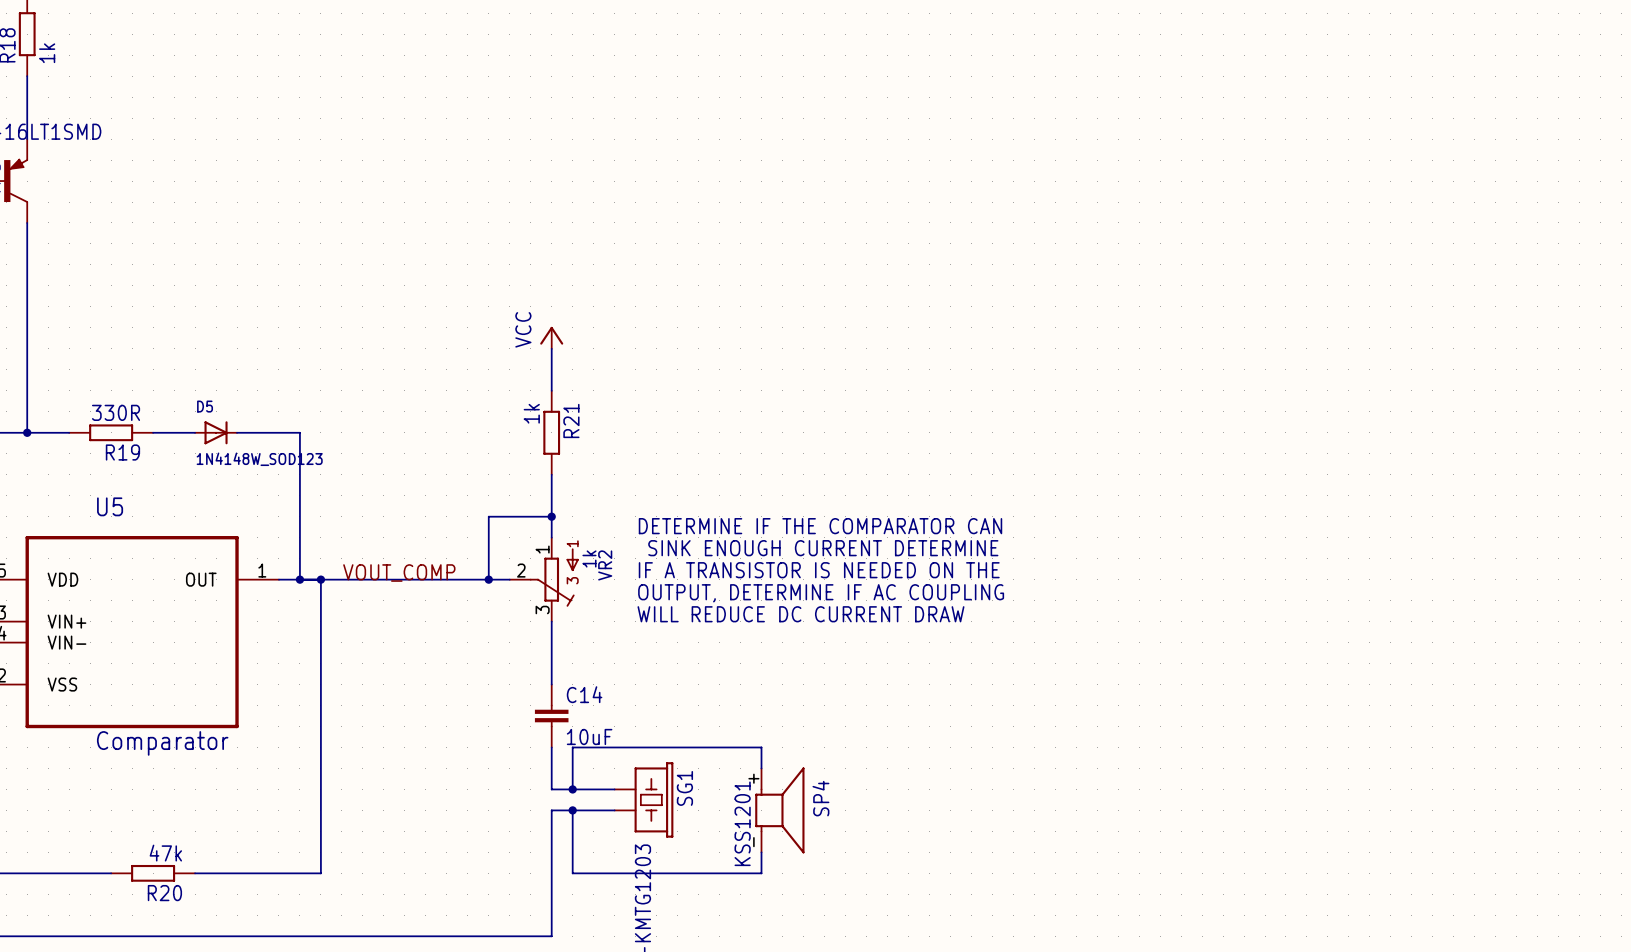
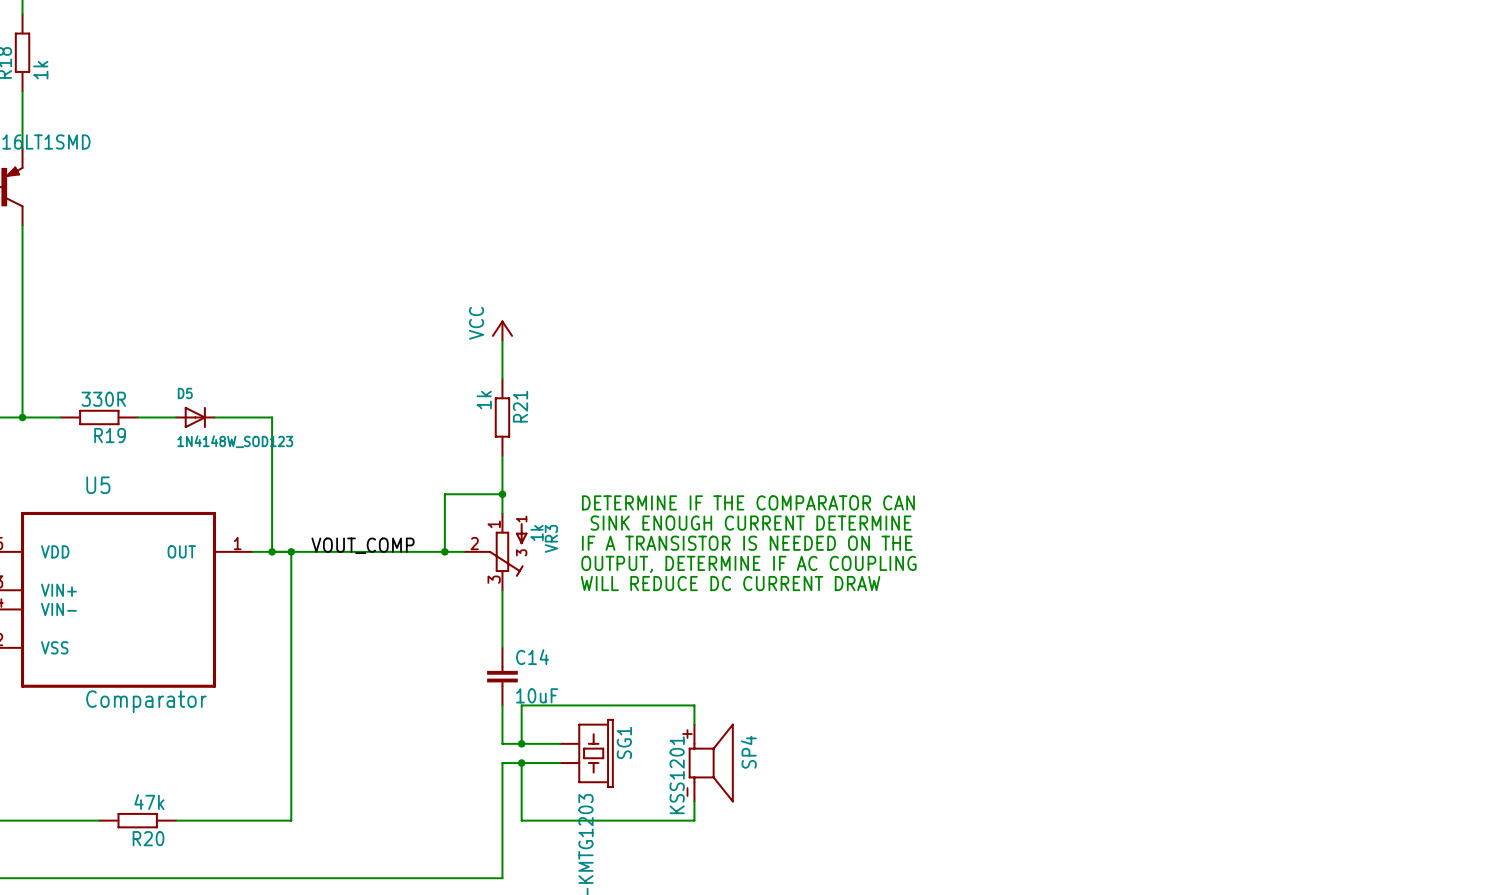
VR2 name: VR2 (605, 565) -> VR3 (551, 538)

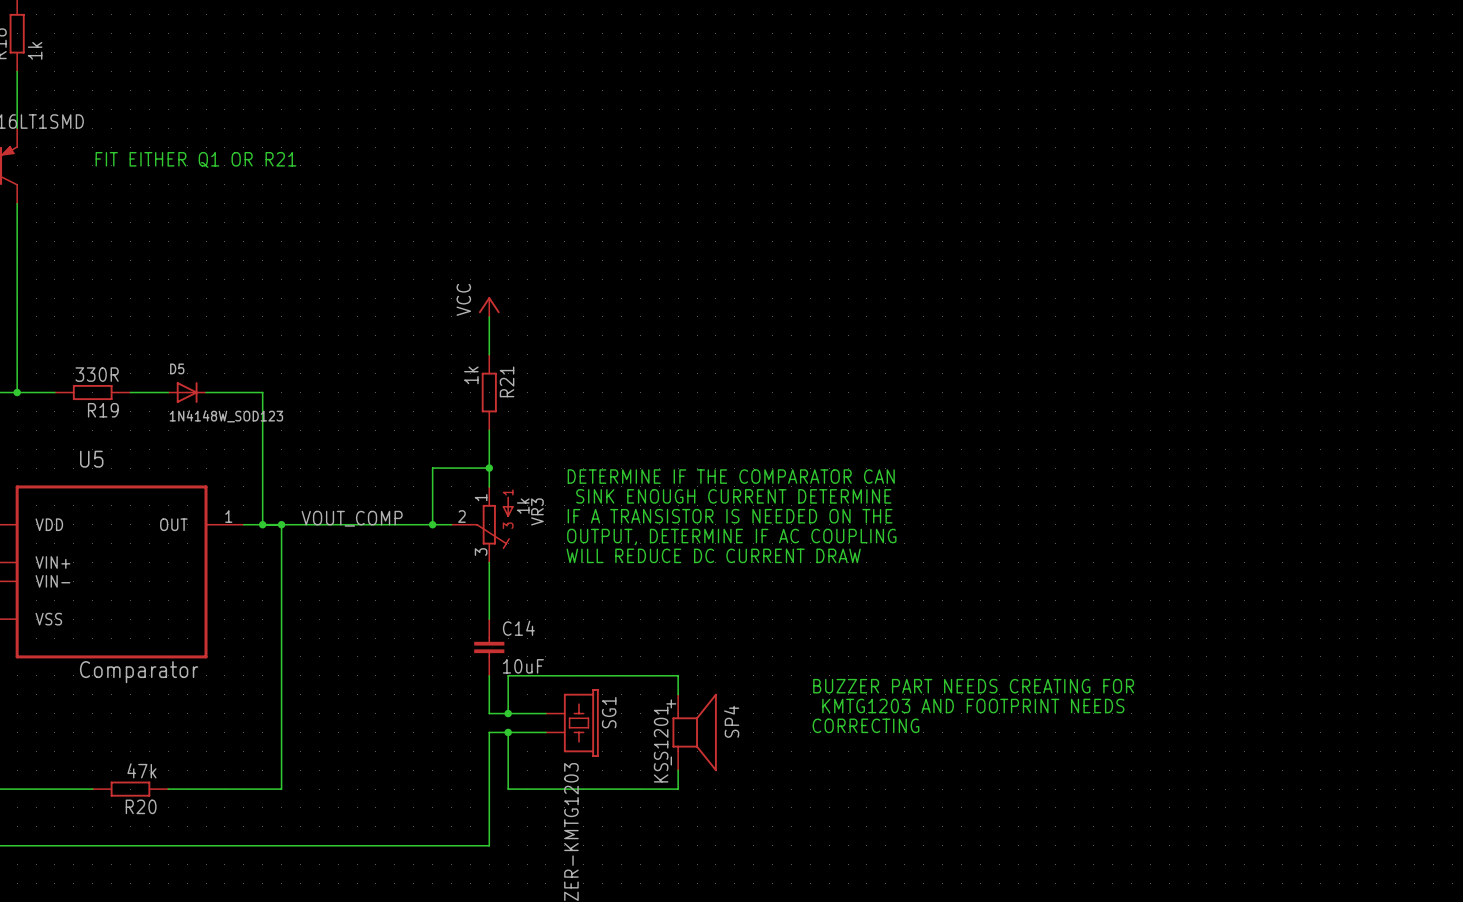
text: none -> FIT EITHER Q1 OR R21 (195, 159)
text: none -> BUZZER PART NEEDS CREATING FOR (973, 686)
text: none -> KMTG1203 AND FOOTPRINT NEEDS (973, 706)
text: none -> CORRECTING (865, 725)

